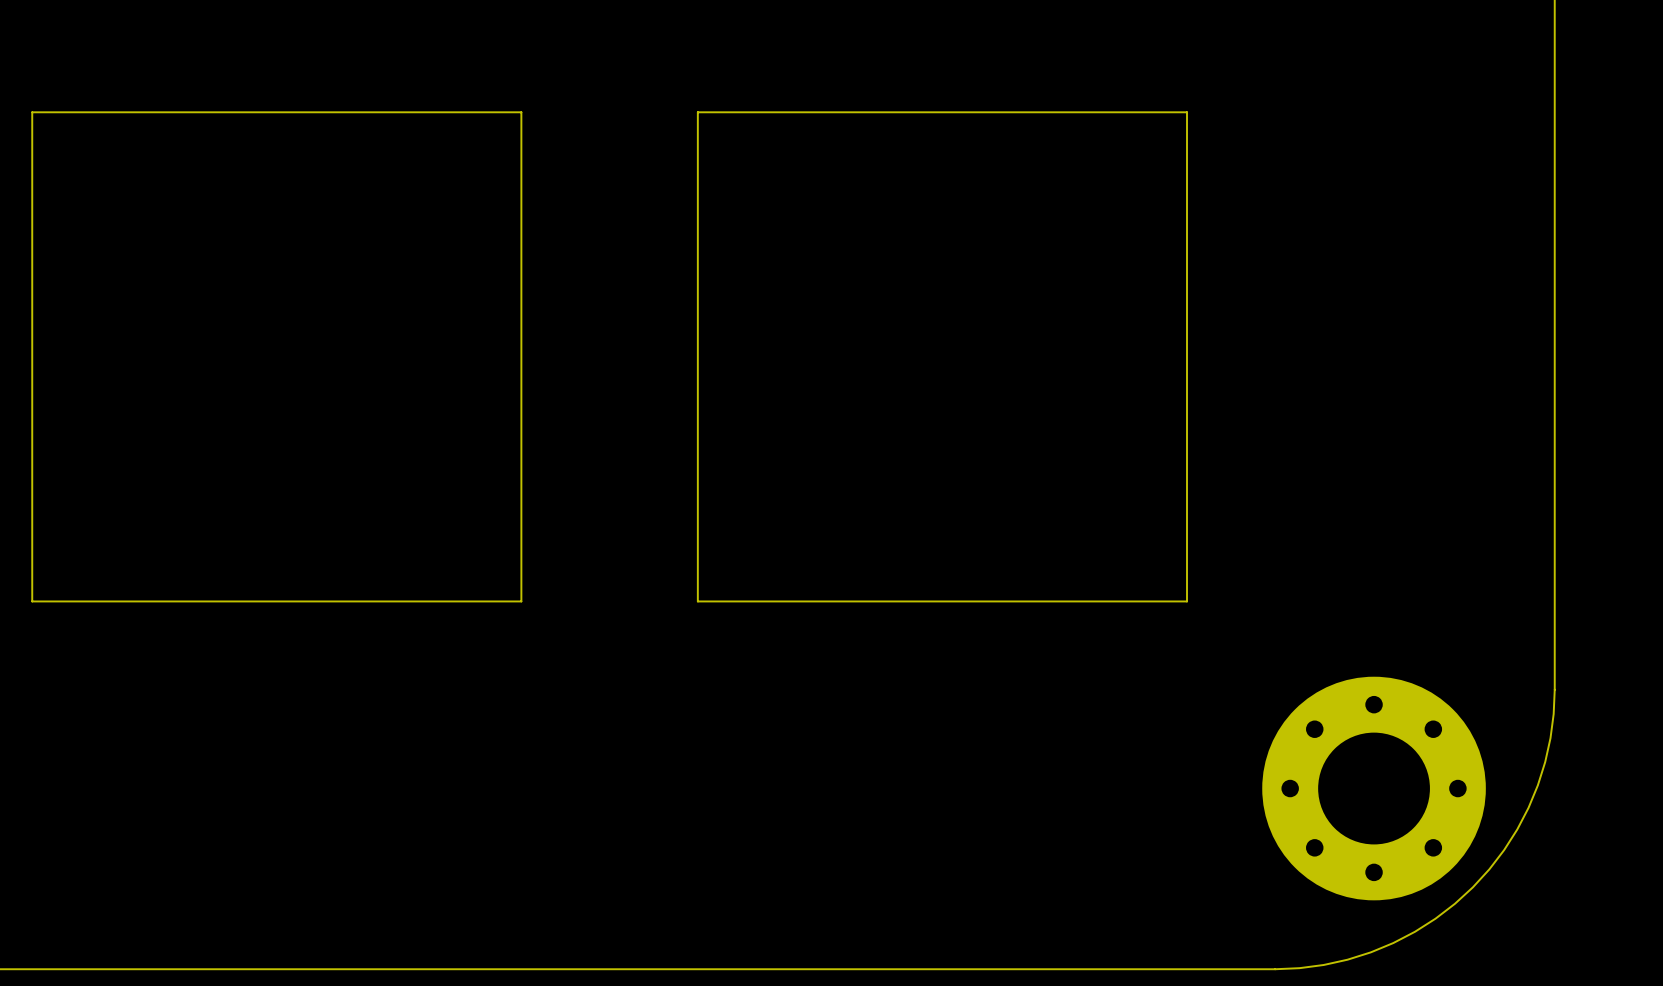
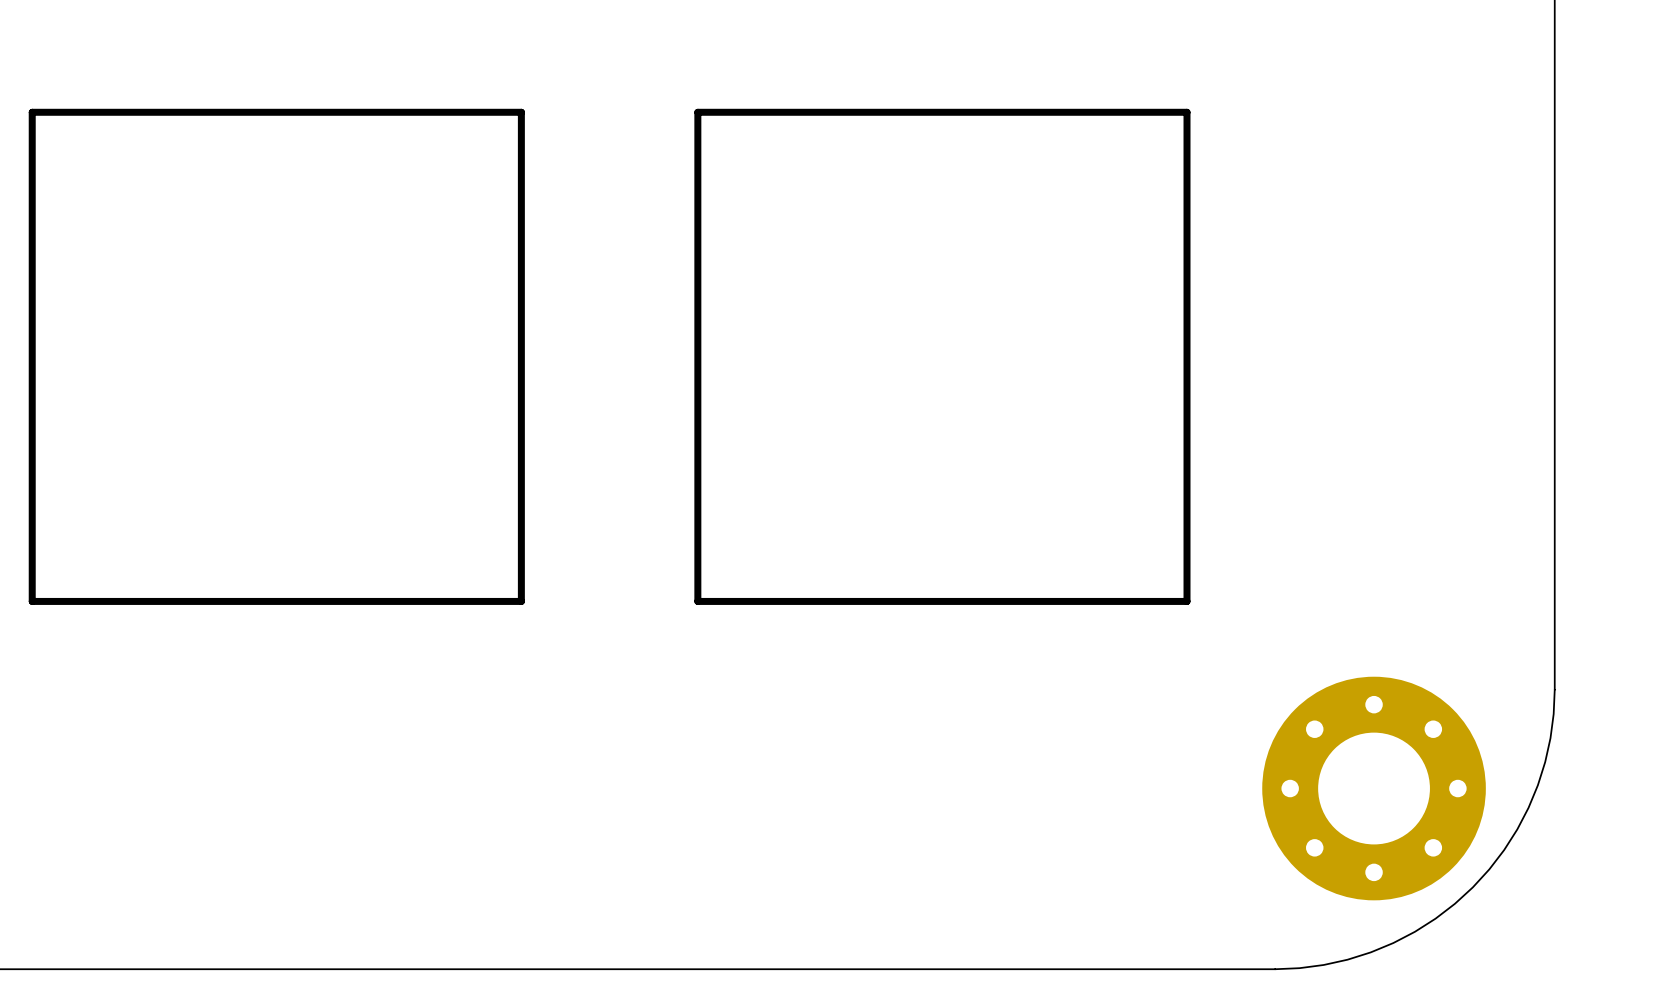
board edge width: thin (521, 112) (32, 112) (32, 601) (521, 601) (521, 112) -> thick (521, 112) (32, 112) (32, 601) (521, 601) (521, 112)
board edge width: thin (1187, 112) (697, 112) (697, 601) (1187, 601) (1187, 112) -> thick (1187, 112) (697, 112) (697, 601) (1187, 601) (1187, 112)

